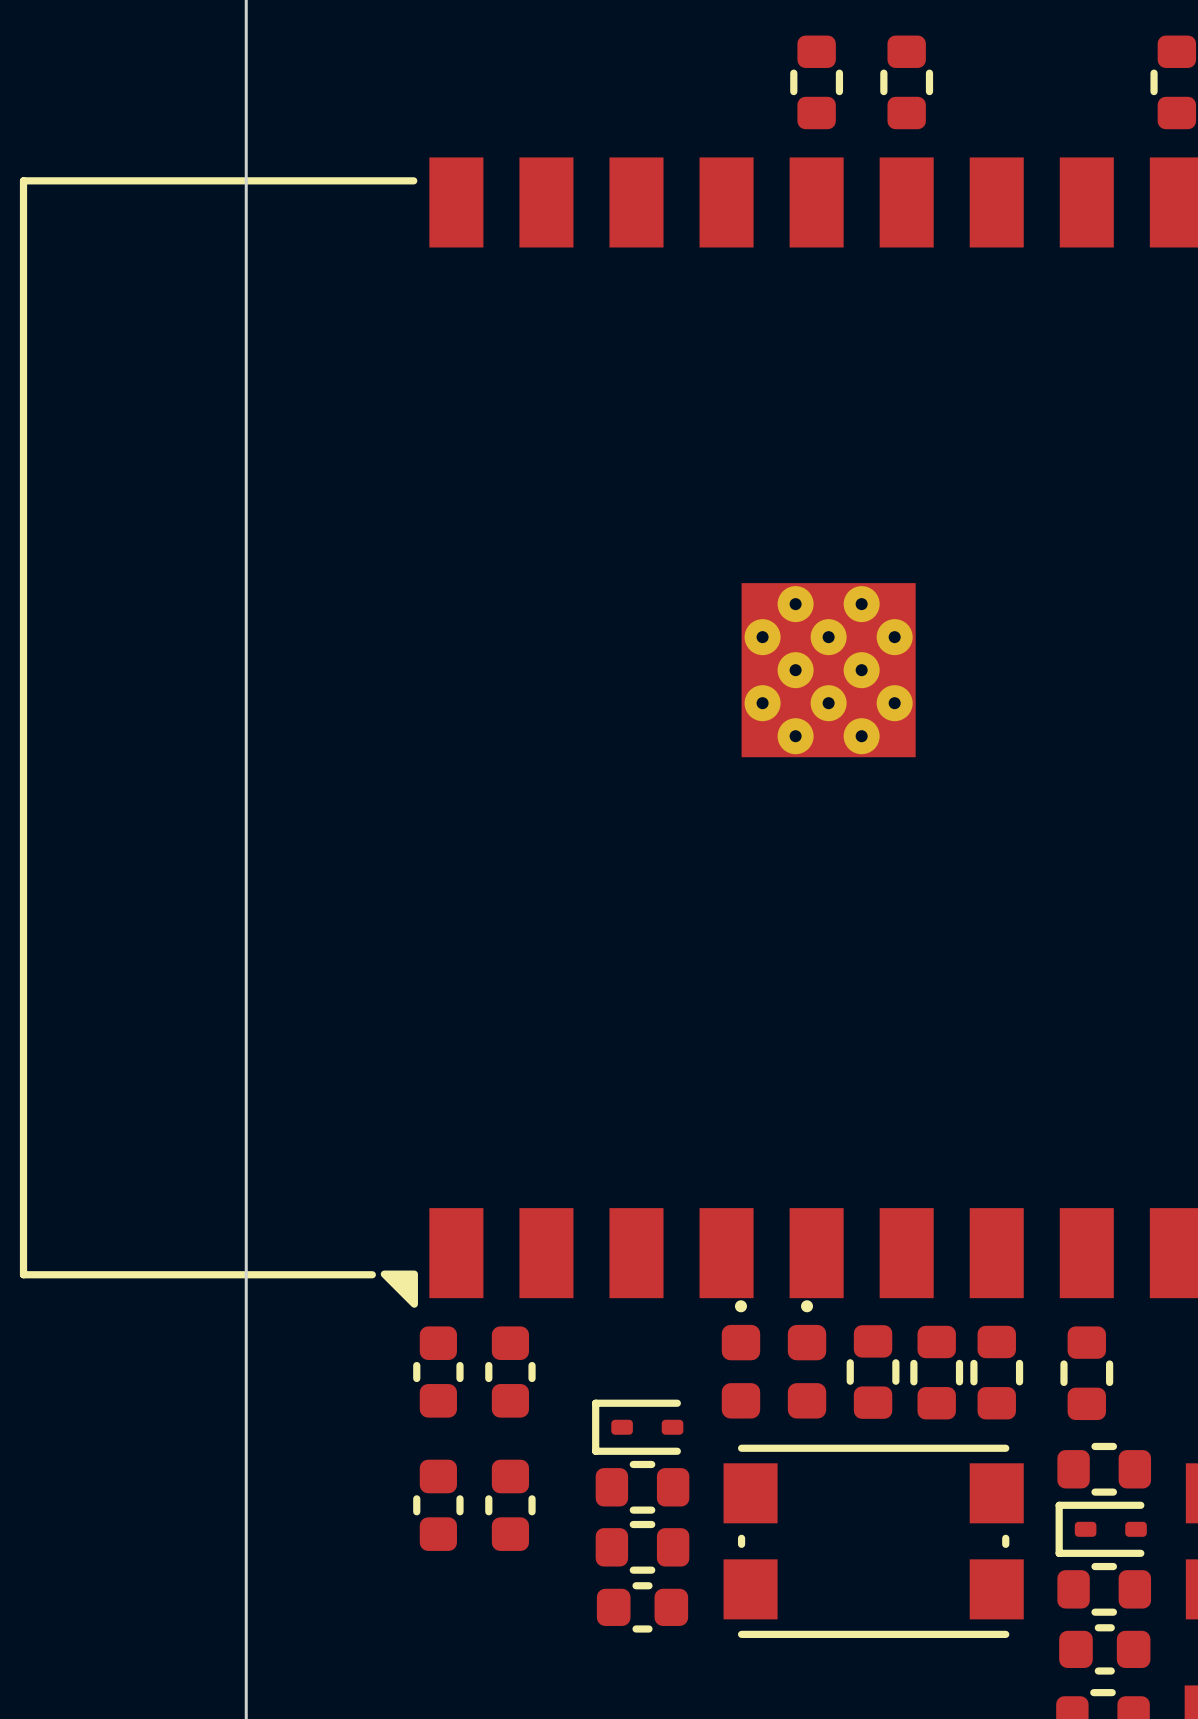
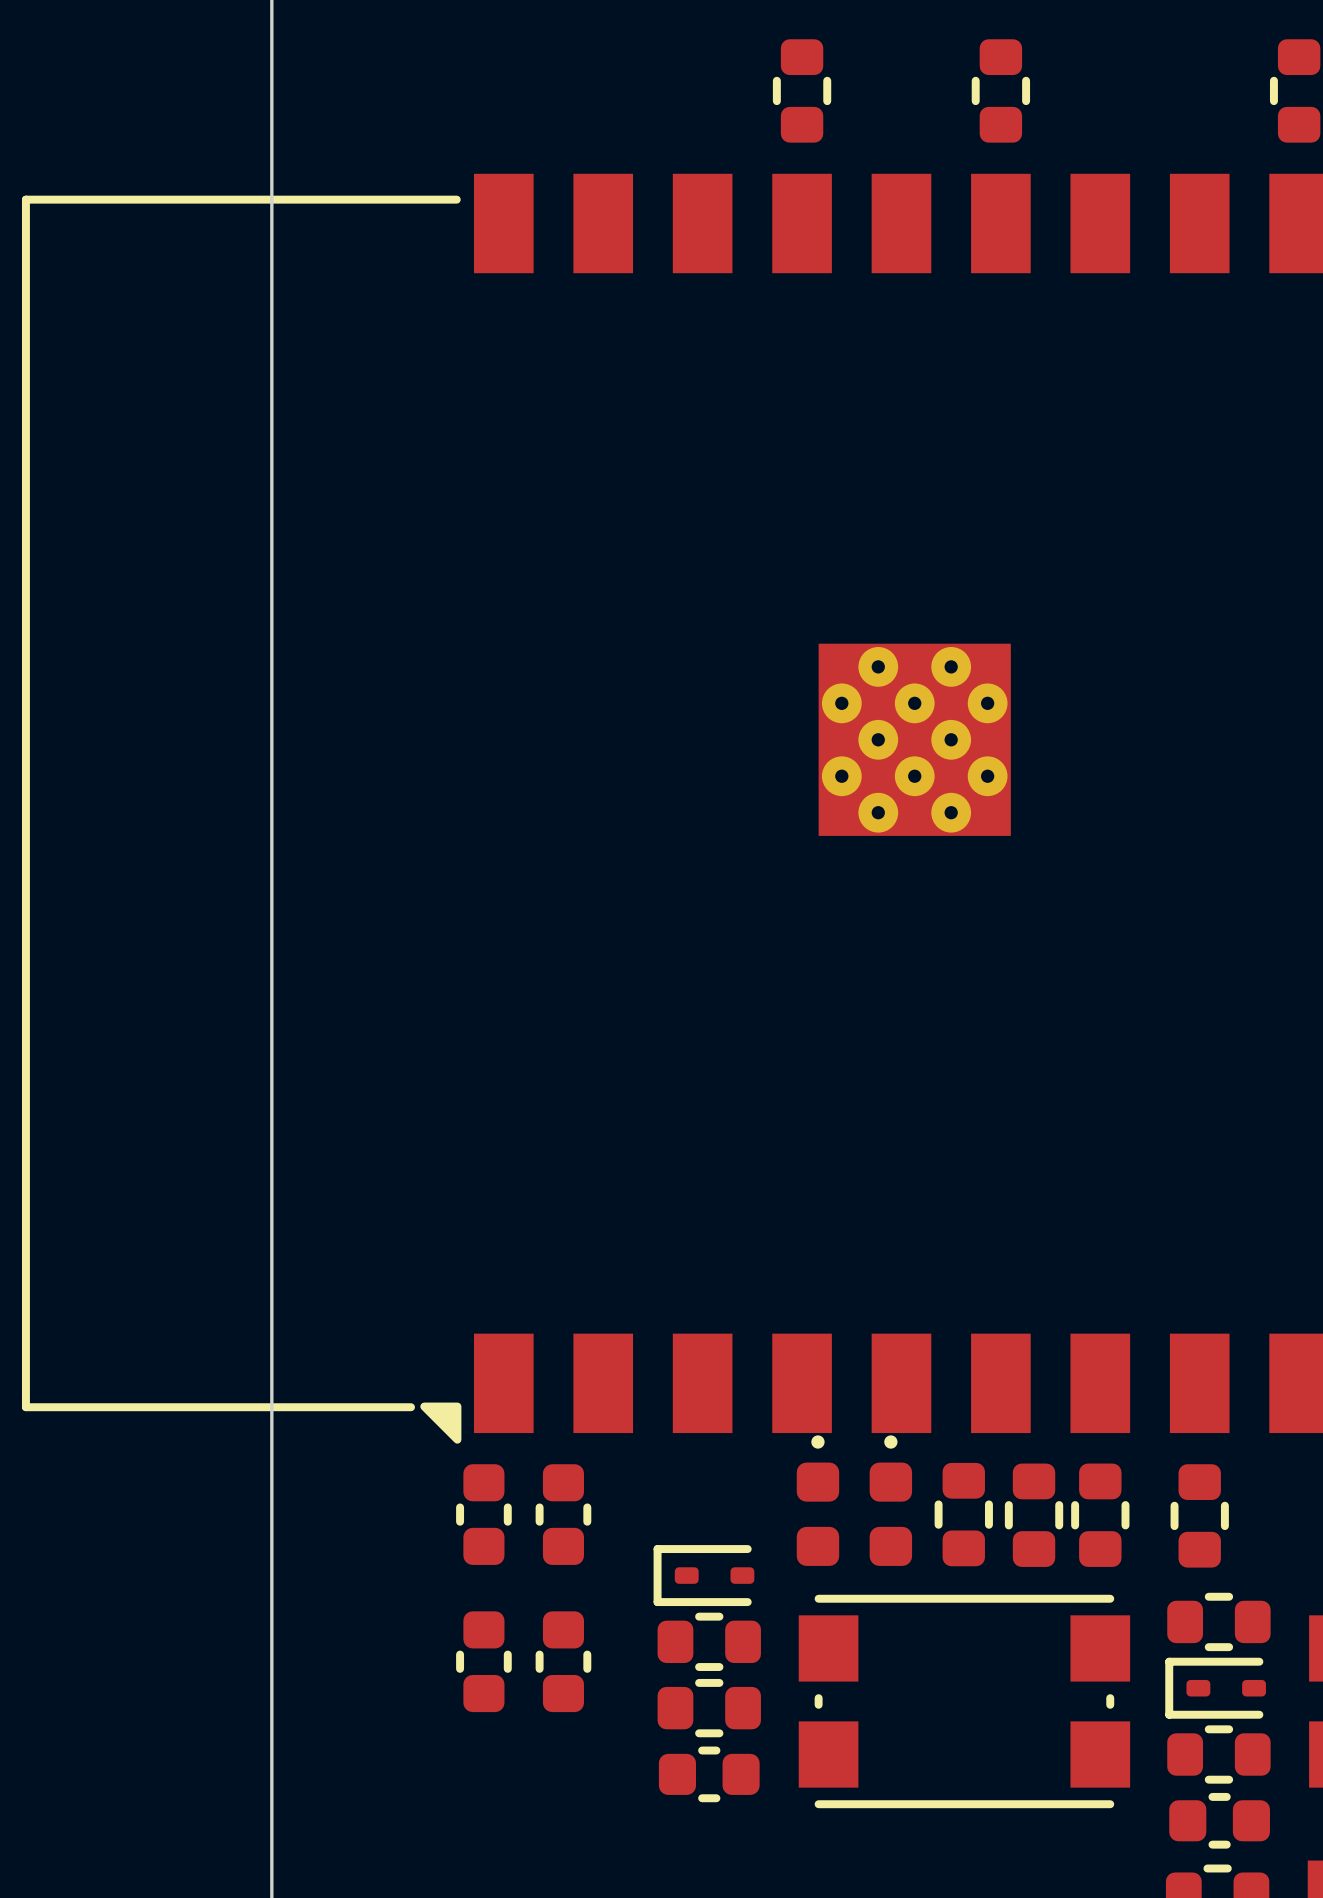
part position: (816, 82) -> (802, 90)

